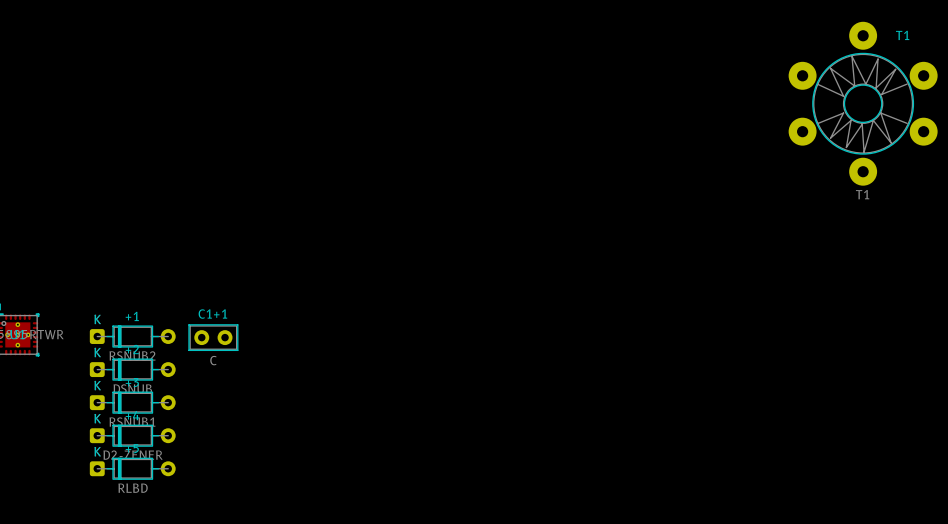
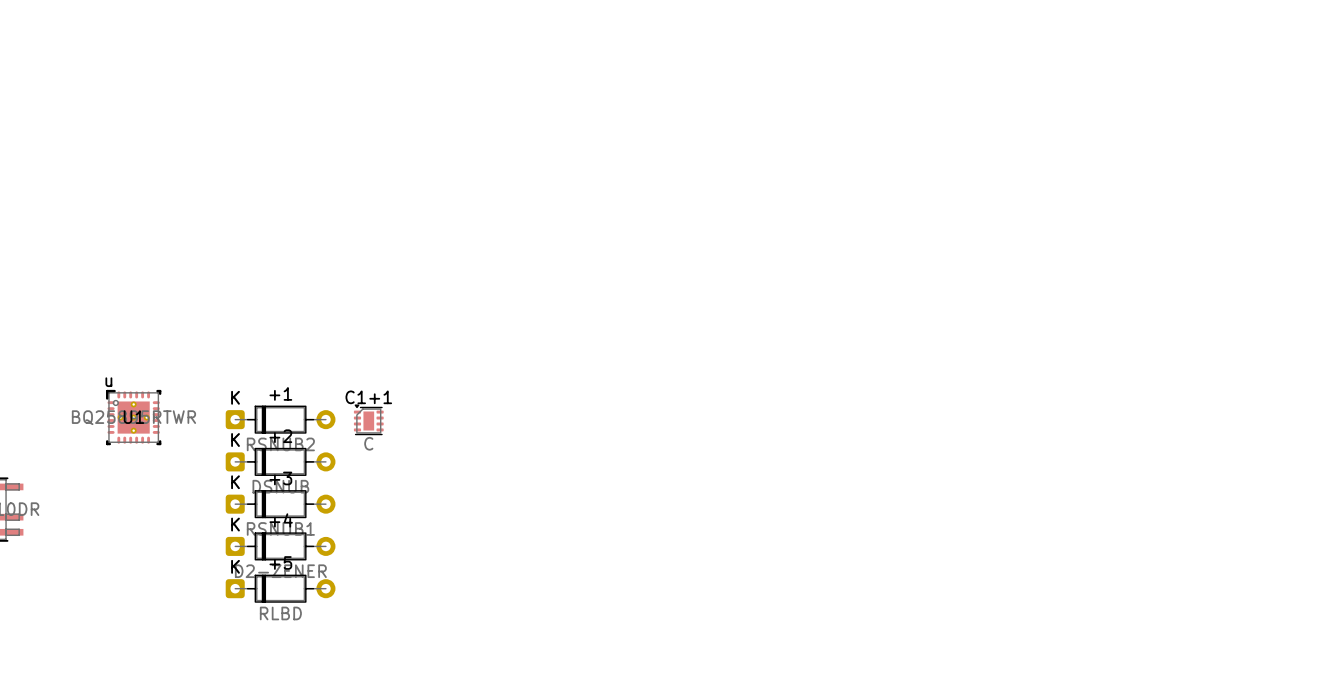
T1: T1 (863, 103) -> none
C1+1 footprint: [188, 324, 239, 351] -> [353, 404, 384, 436]

